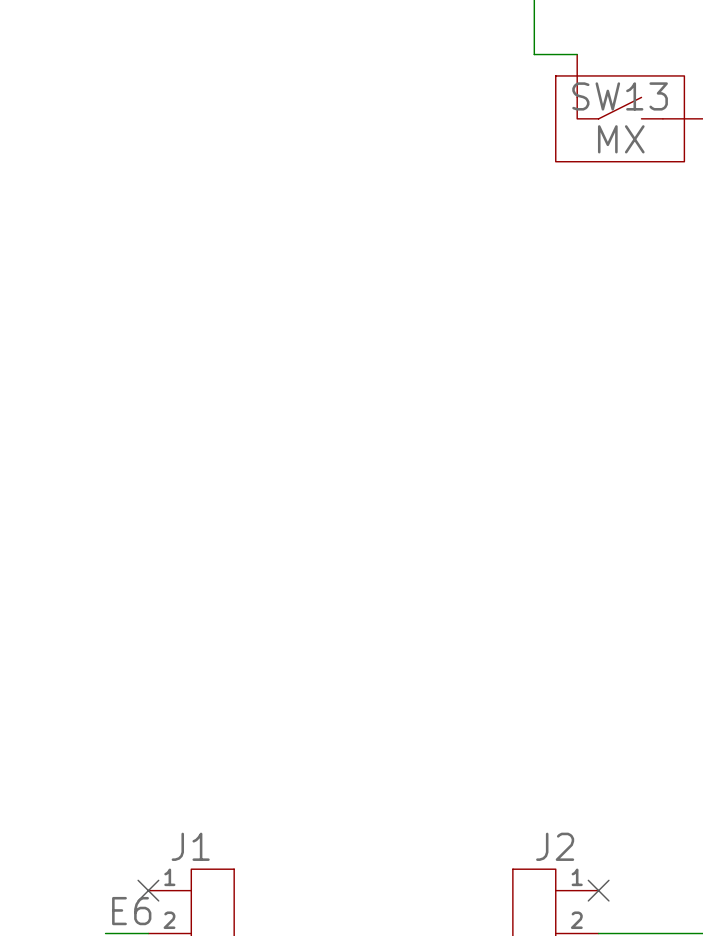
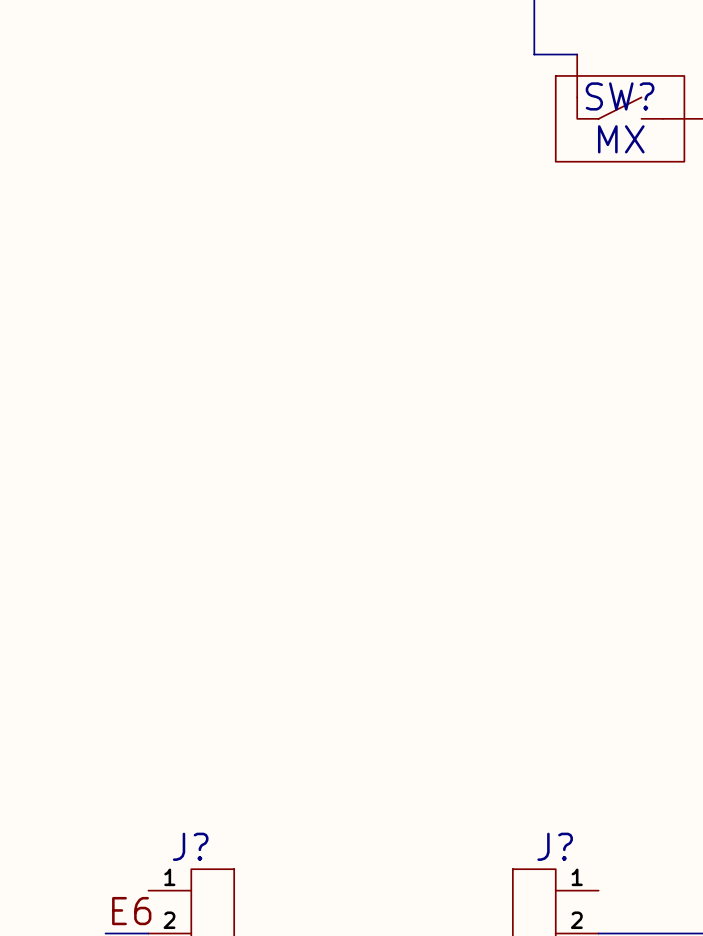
SW13 name: SW13 (620, 96) -> SW? (620, 96)
J1 name: J1 (190, 846) -> J? (190, 846)
J2 name: J2 (555, 846) -> J? (555, 846)
no-connect mark: (148, 890) -> none
no-connect mark: (598, 890) -> none

